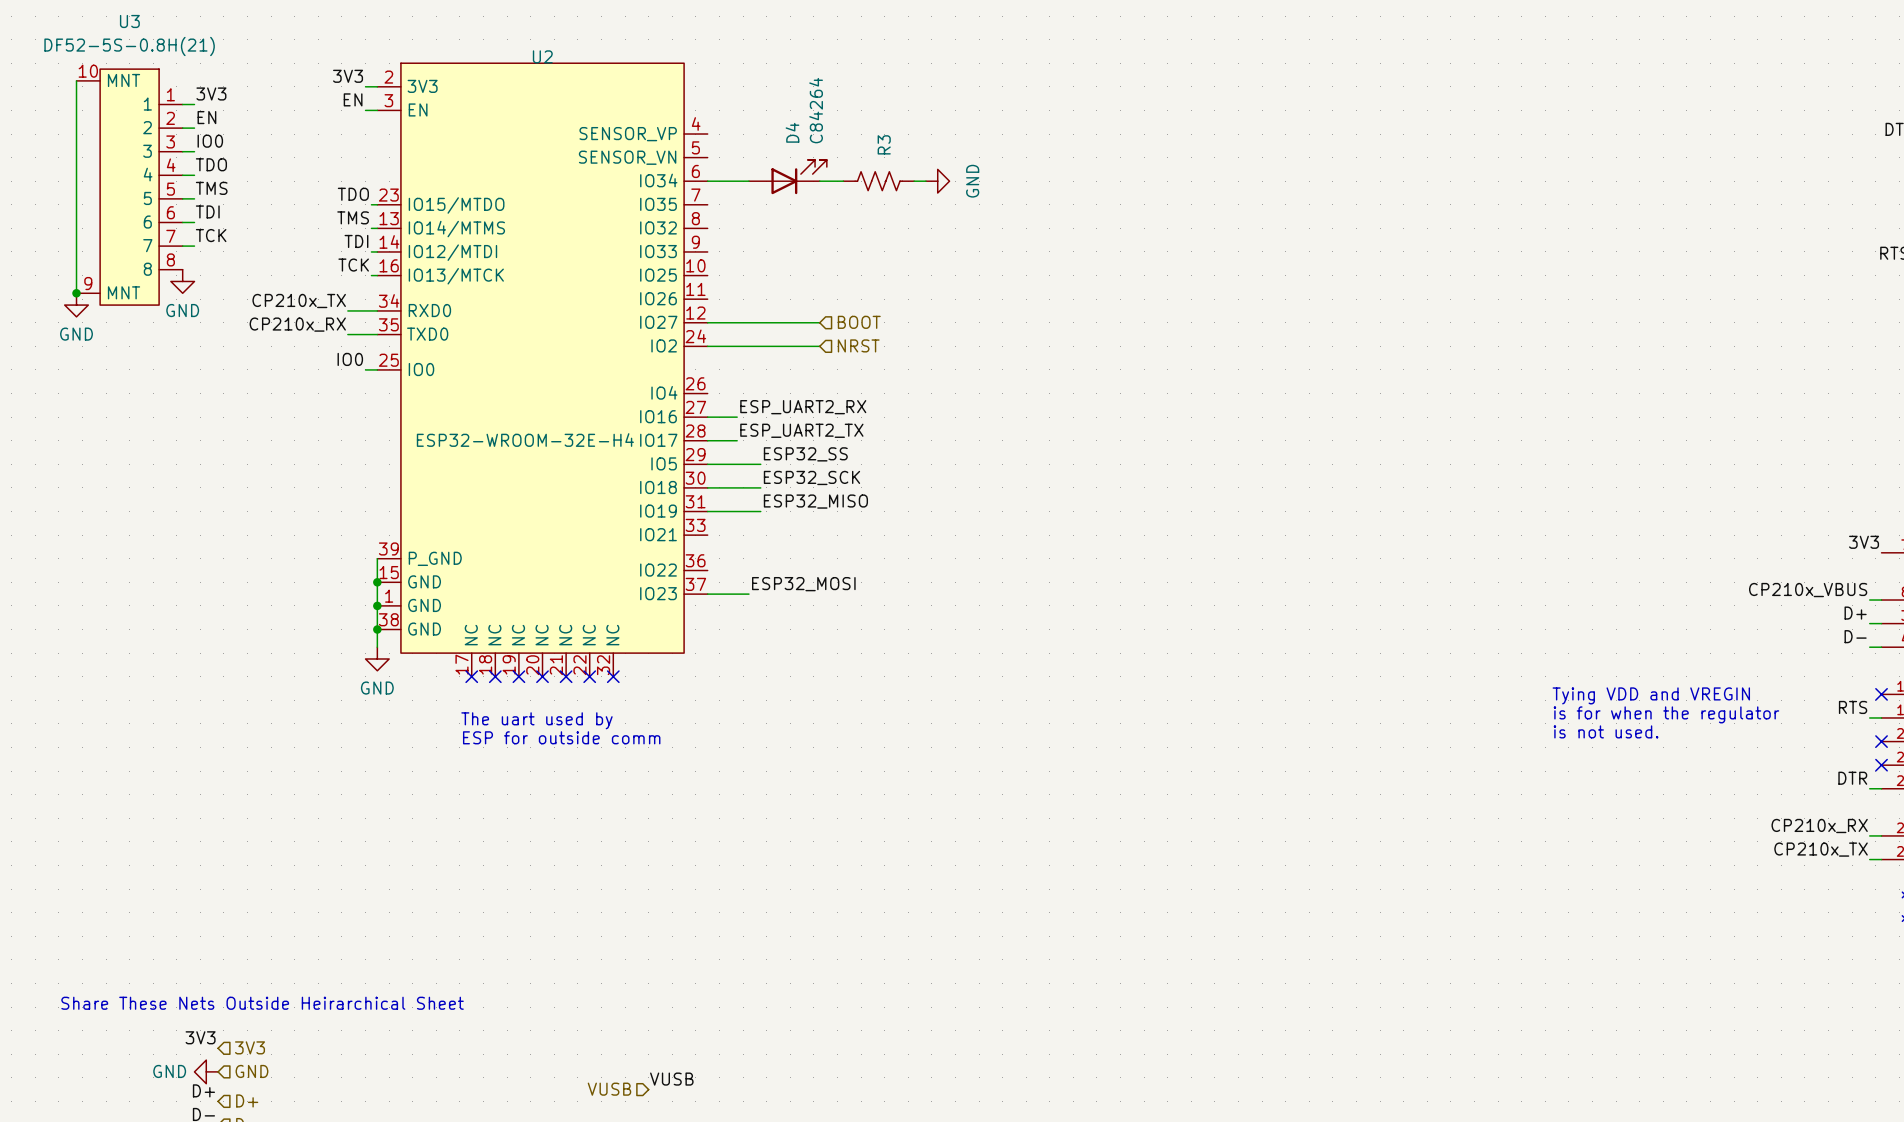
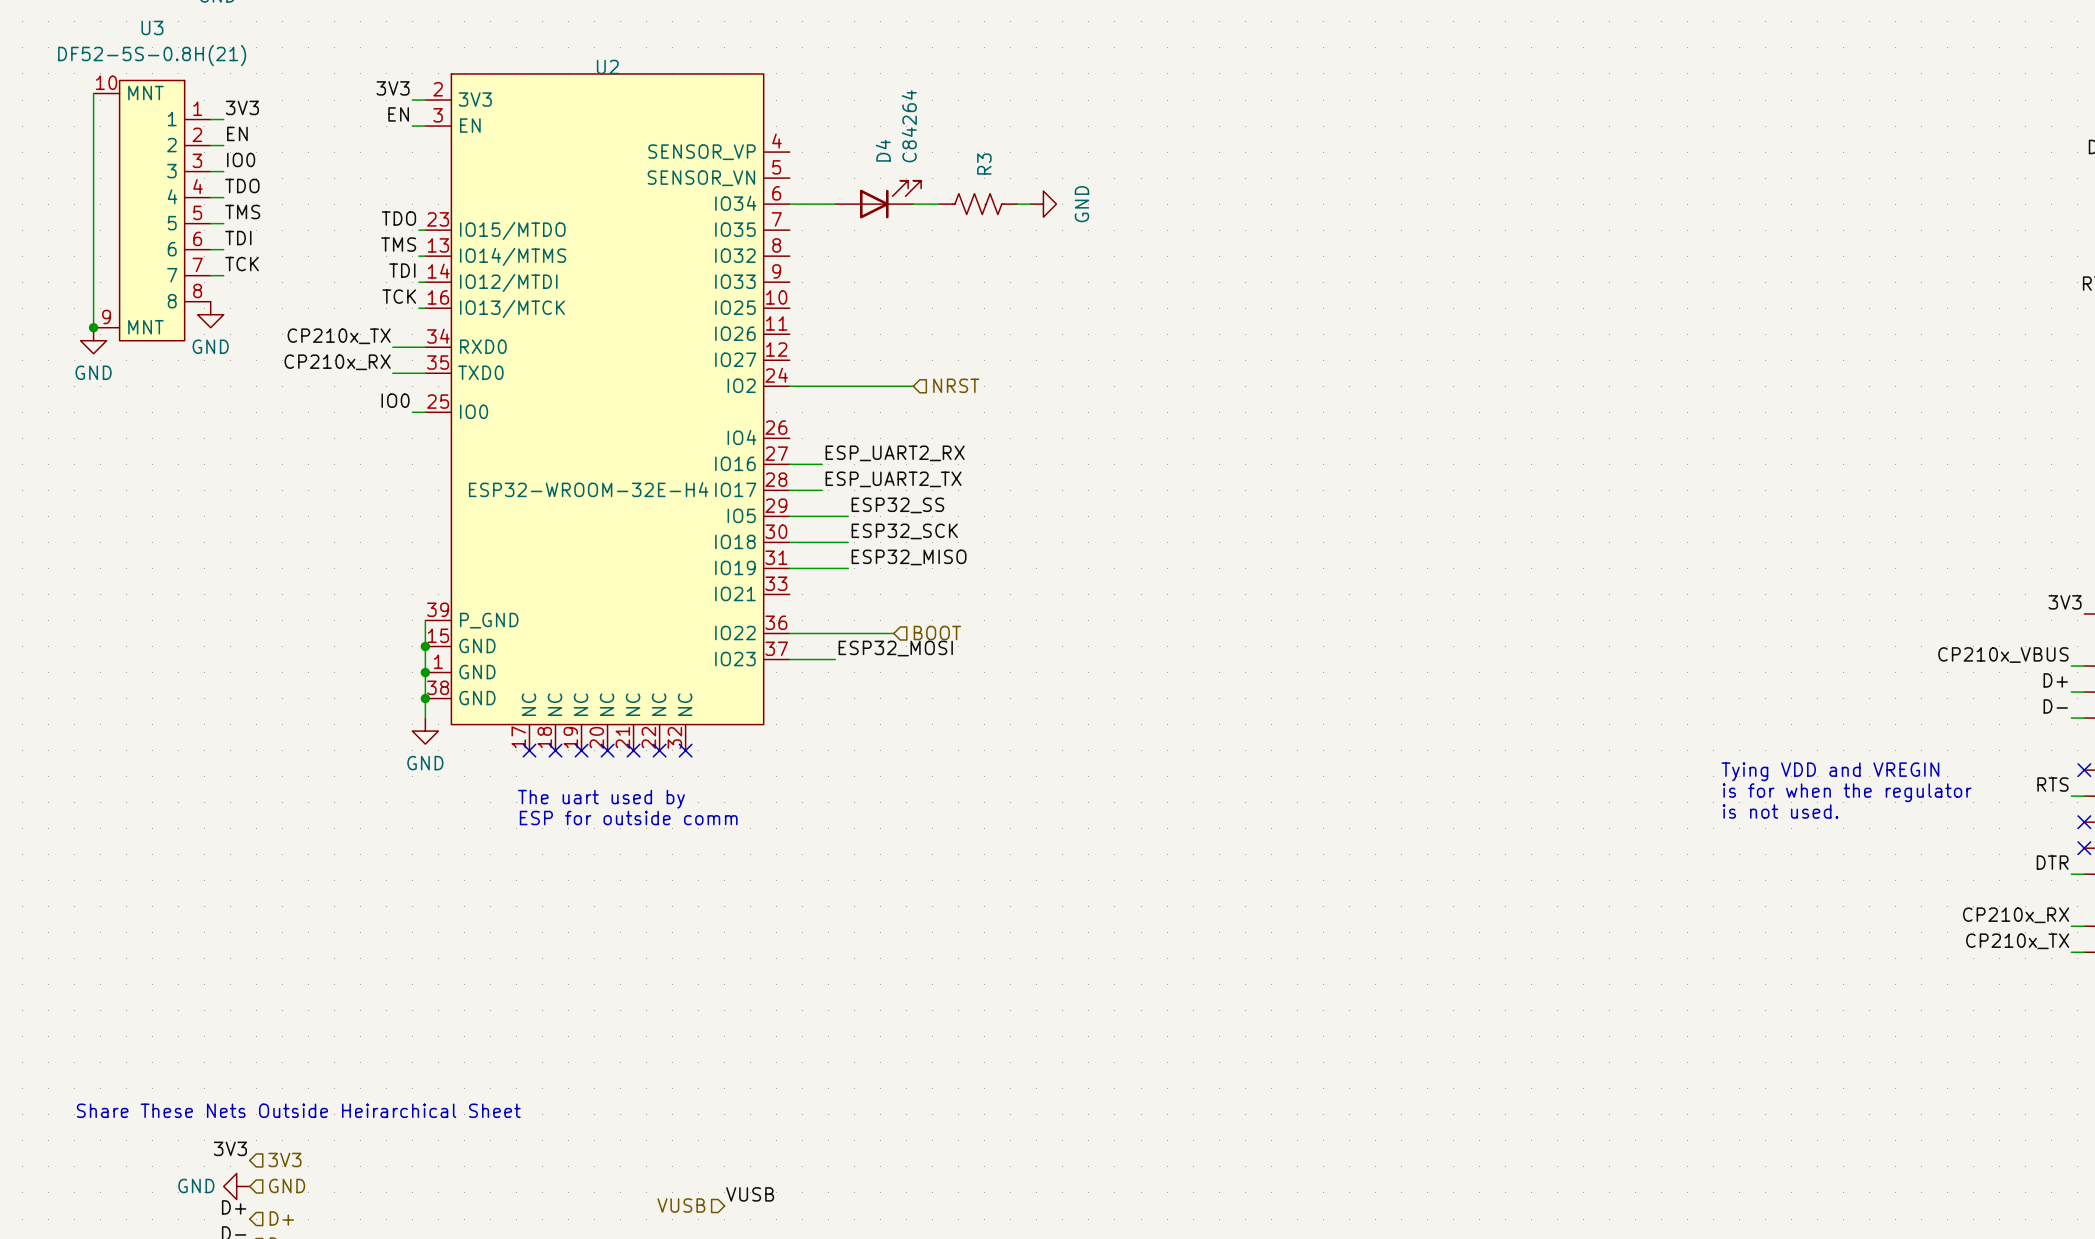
wire: (707, 322) (819, 322) -> none
hierarchical label: BOOT (859, 322) -> none
wire: none -> (789, 633) (893, 633)
hierarchical label: none -> BOOT (937, 633)

